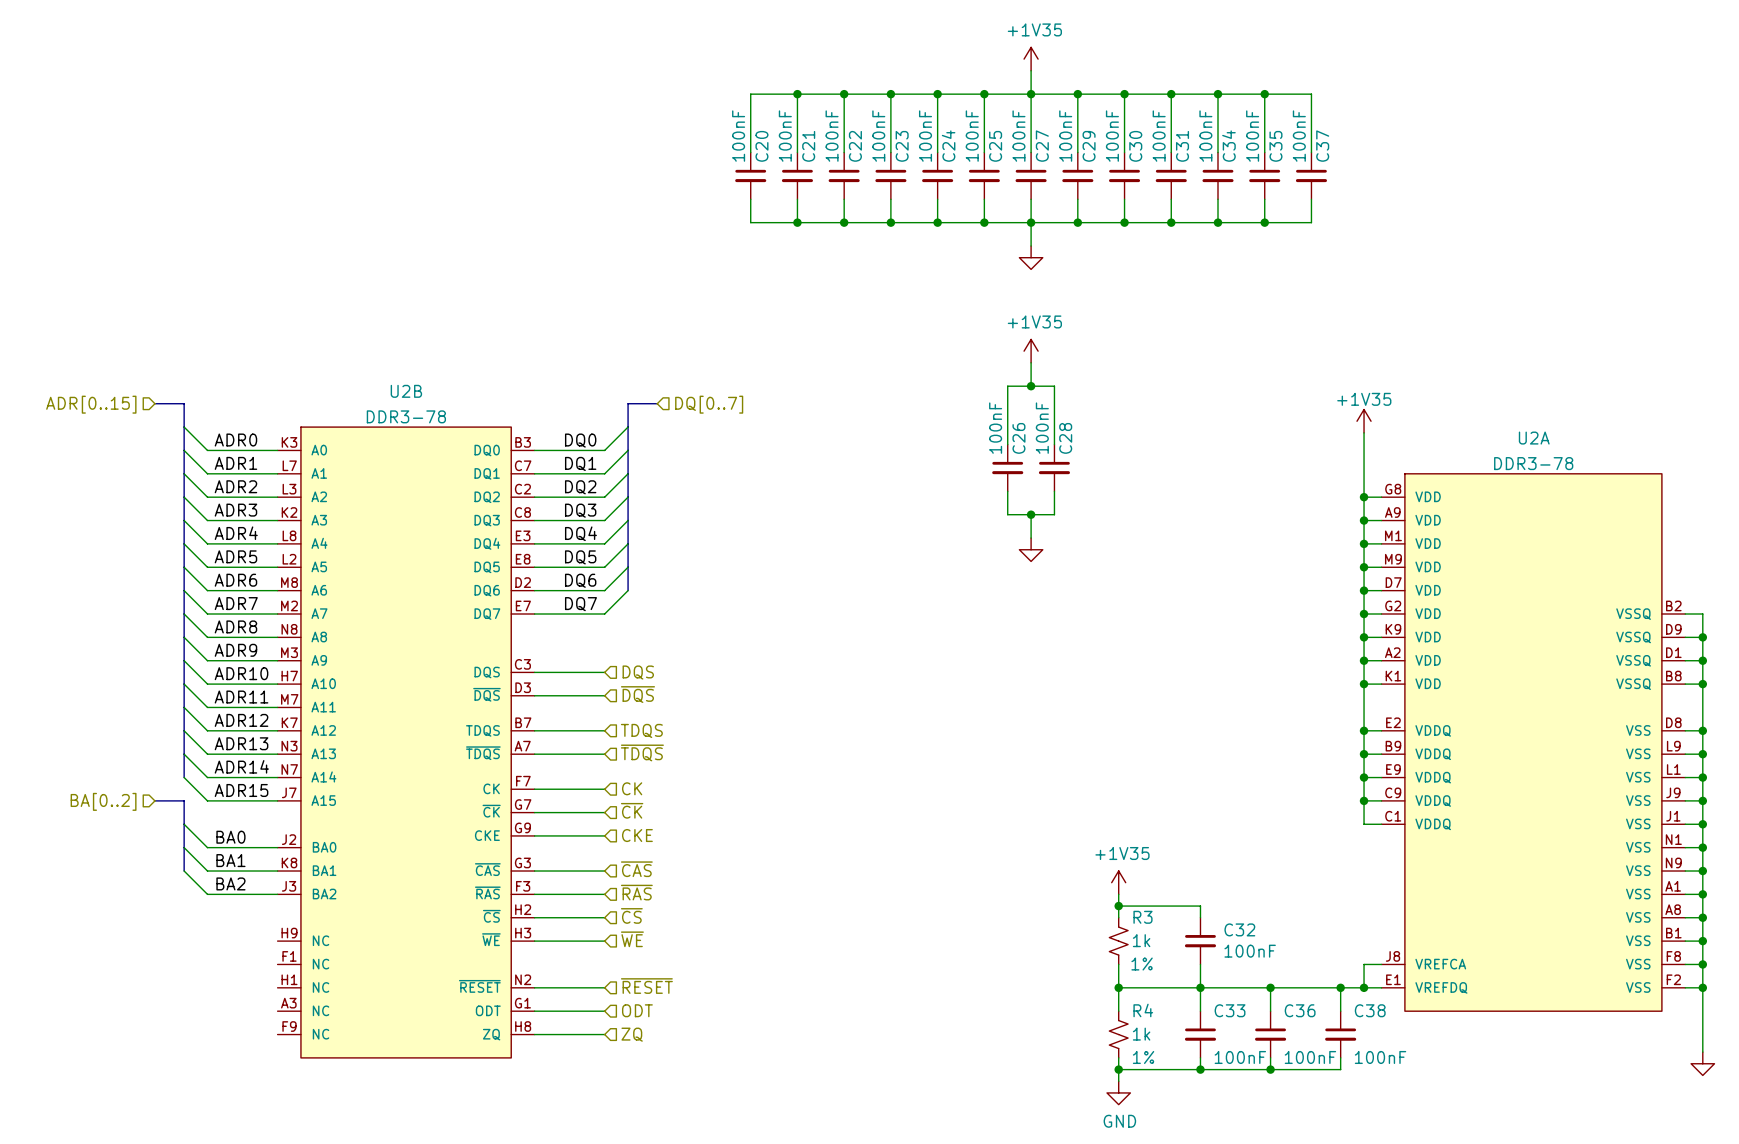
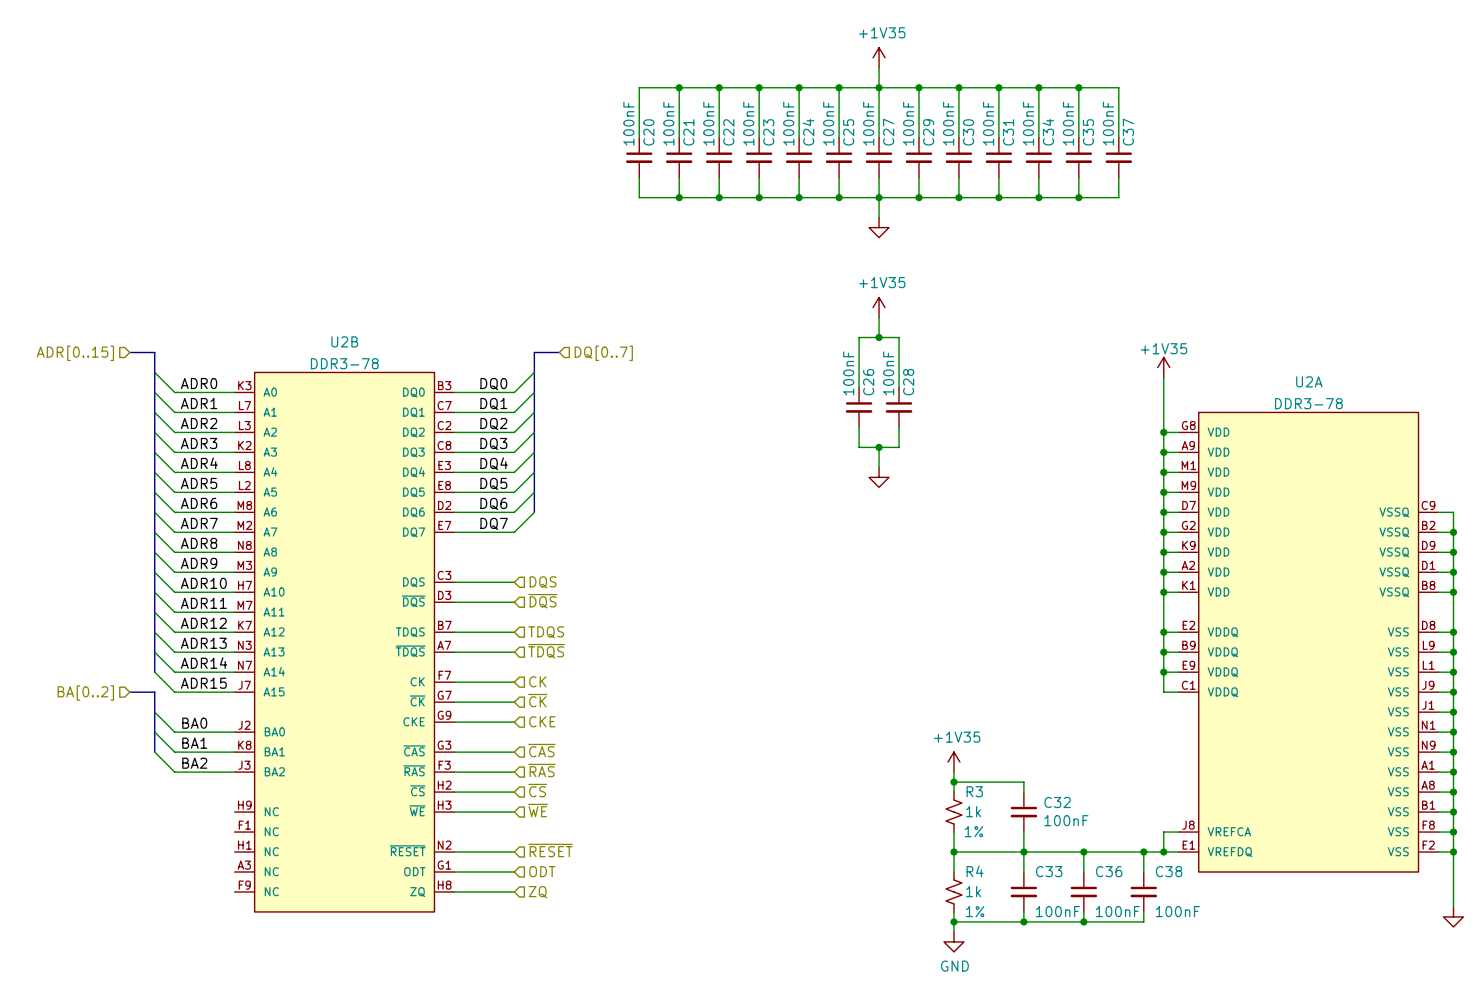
U2A symbol: [1381, 473, 1686, 1012] -> [1178, 412, 1439, 872]
wire: none -> (1438, 512) (1453, 512) (1453, 532)
junction: none -> (1453, 532)
wire: (1364, 800) (1364, 824) (1381, 824) -> none
junction: (1364, 800) -> none

